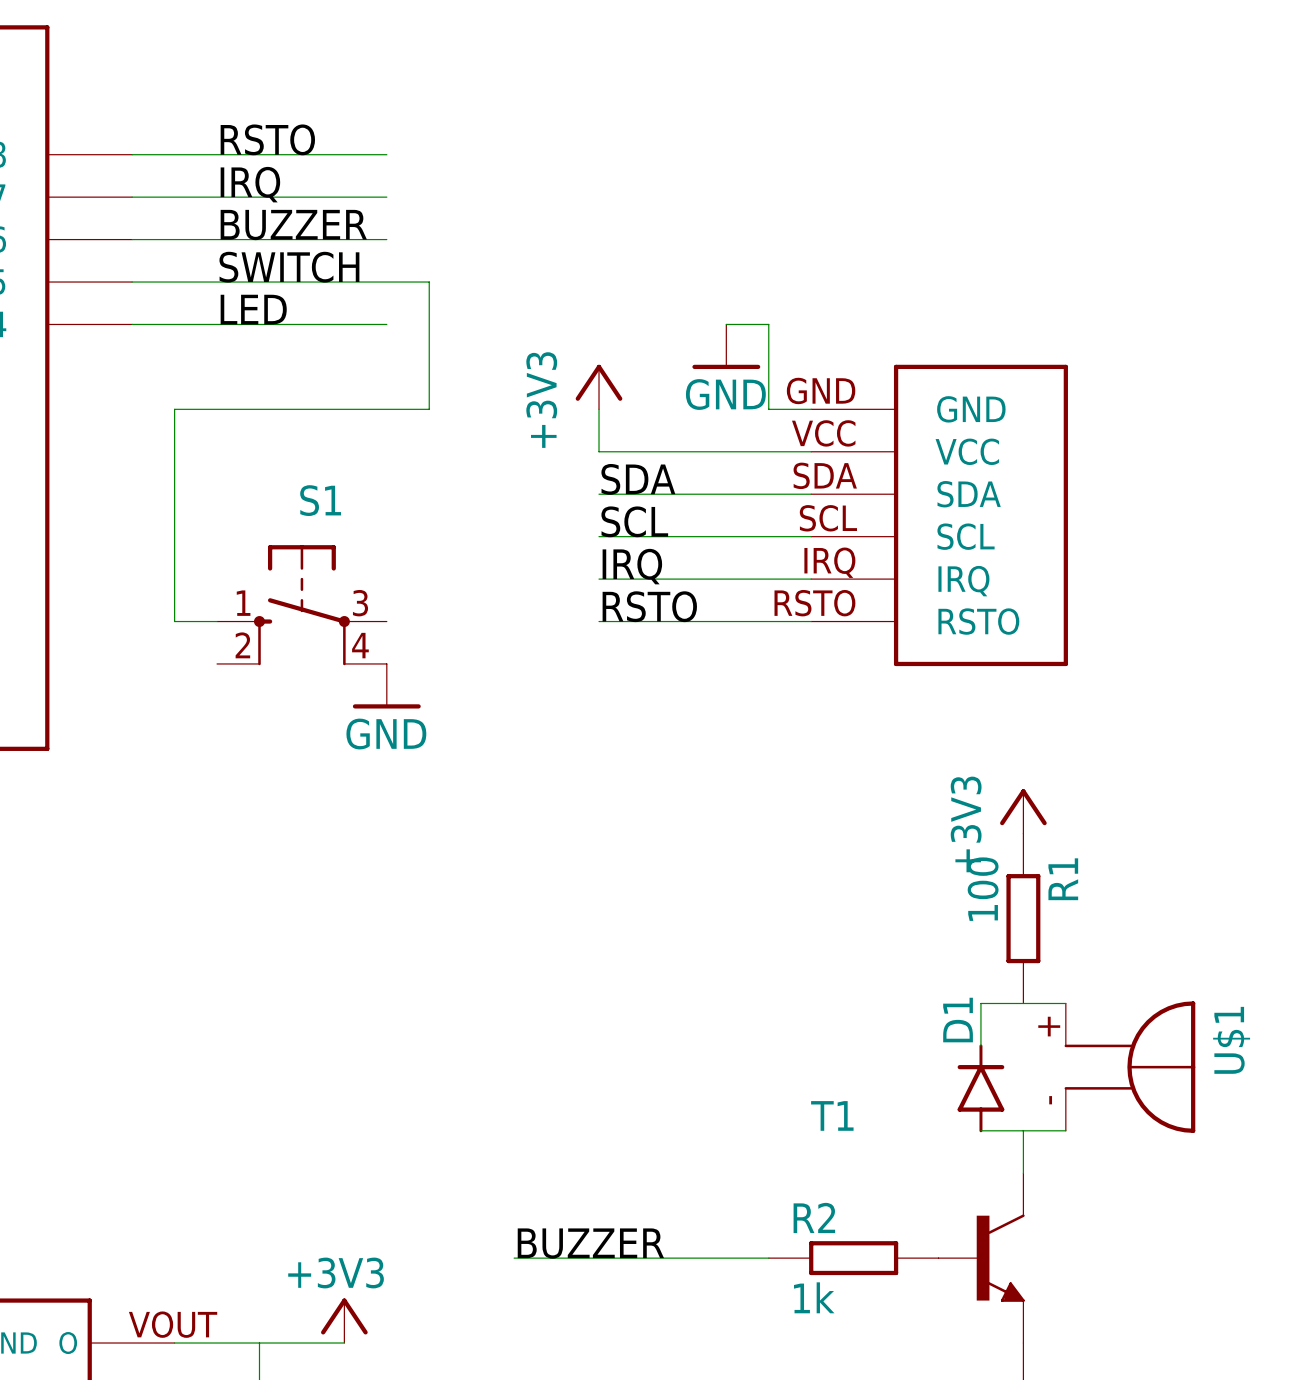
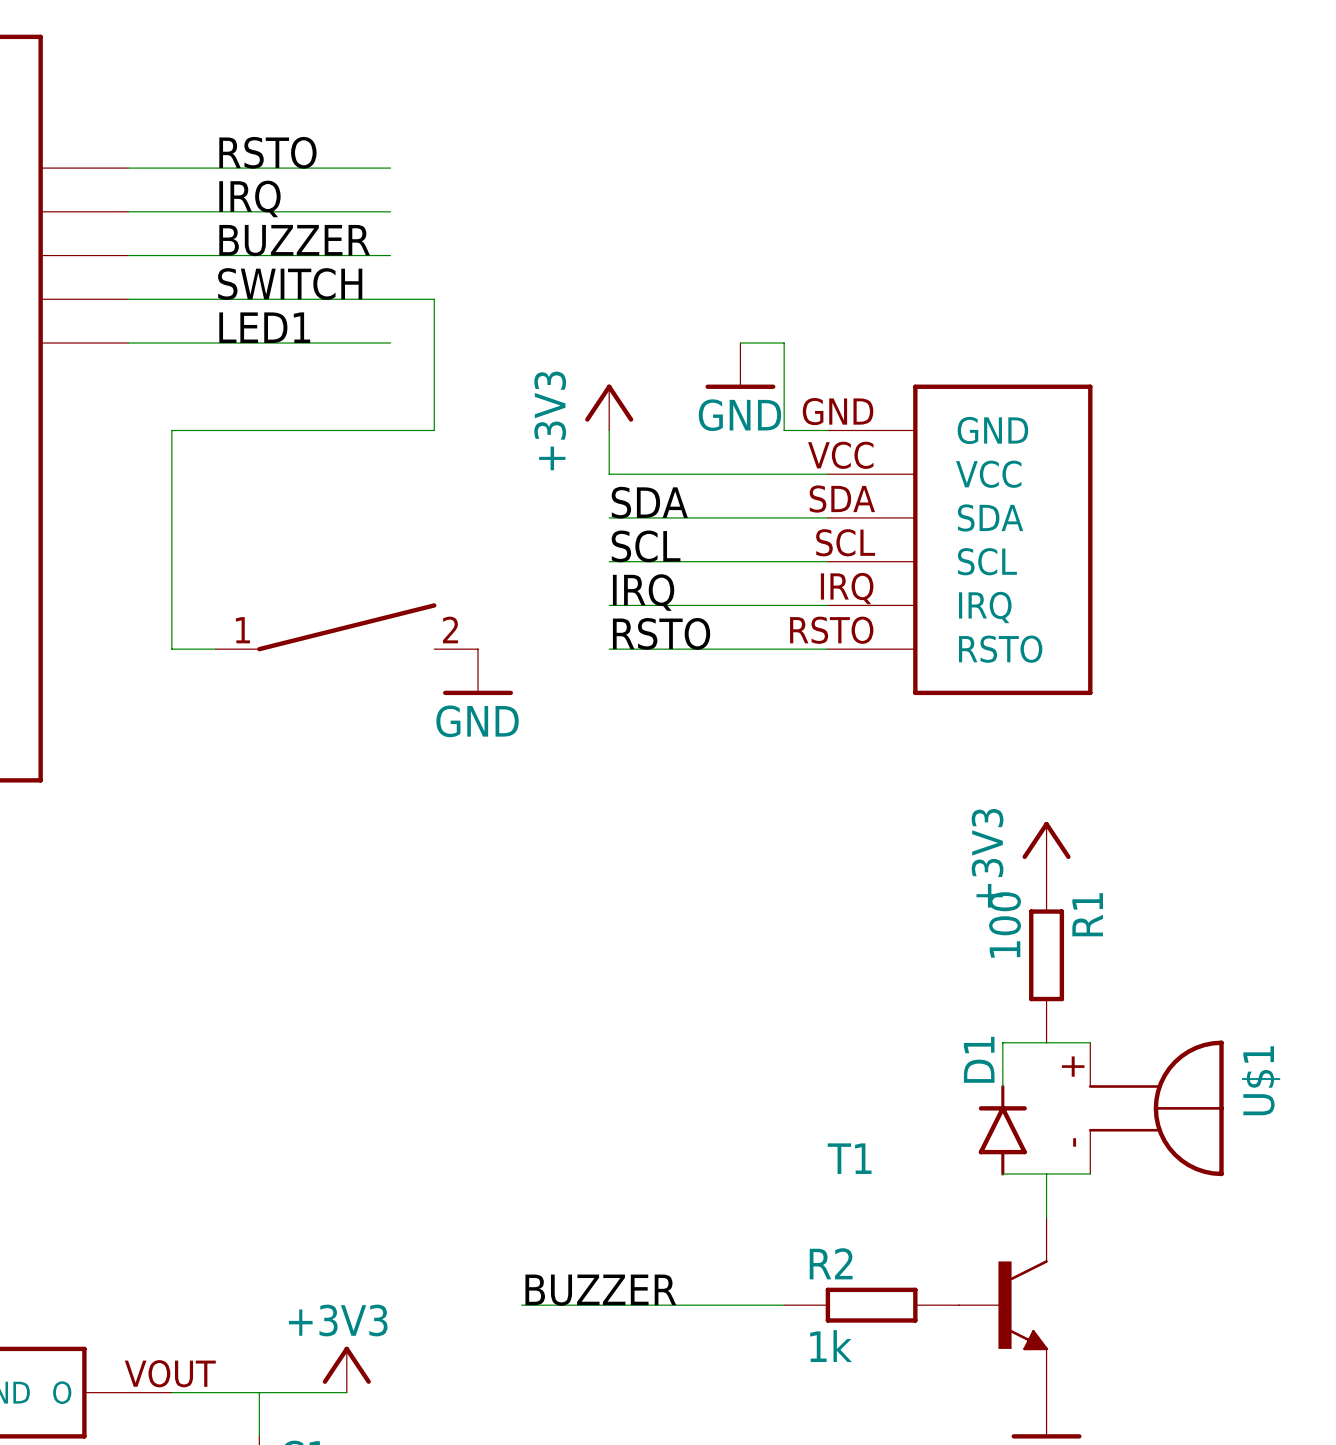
label: LED (253, 309) -> LED1 (264, 327)
part: none -> (346, 627)
S1: (301, 605) -> none
power symbol position: GND (386, 686) -> GND (478, 672)

